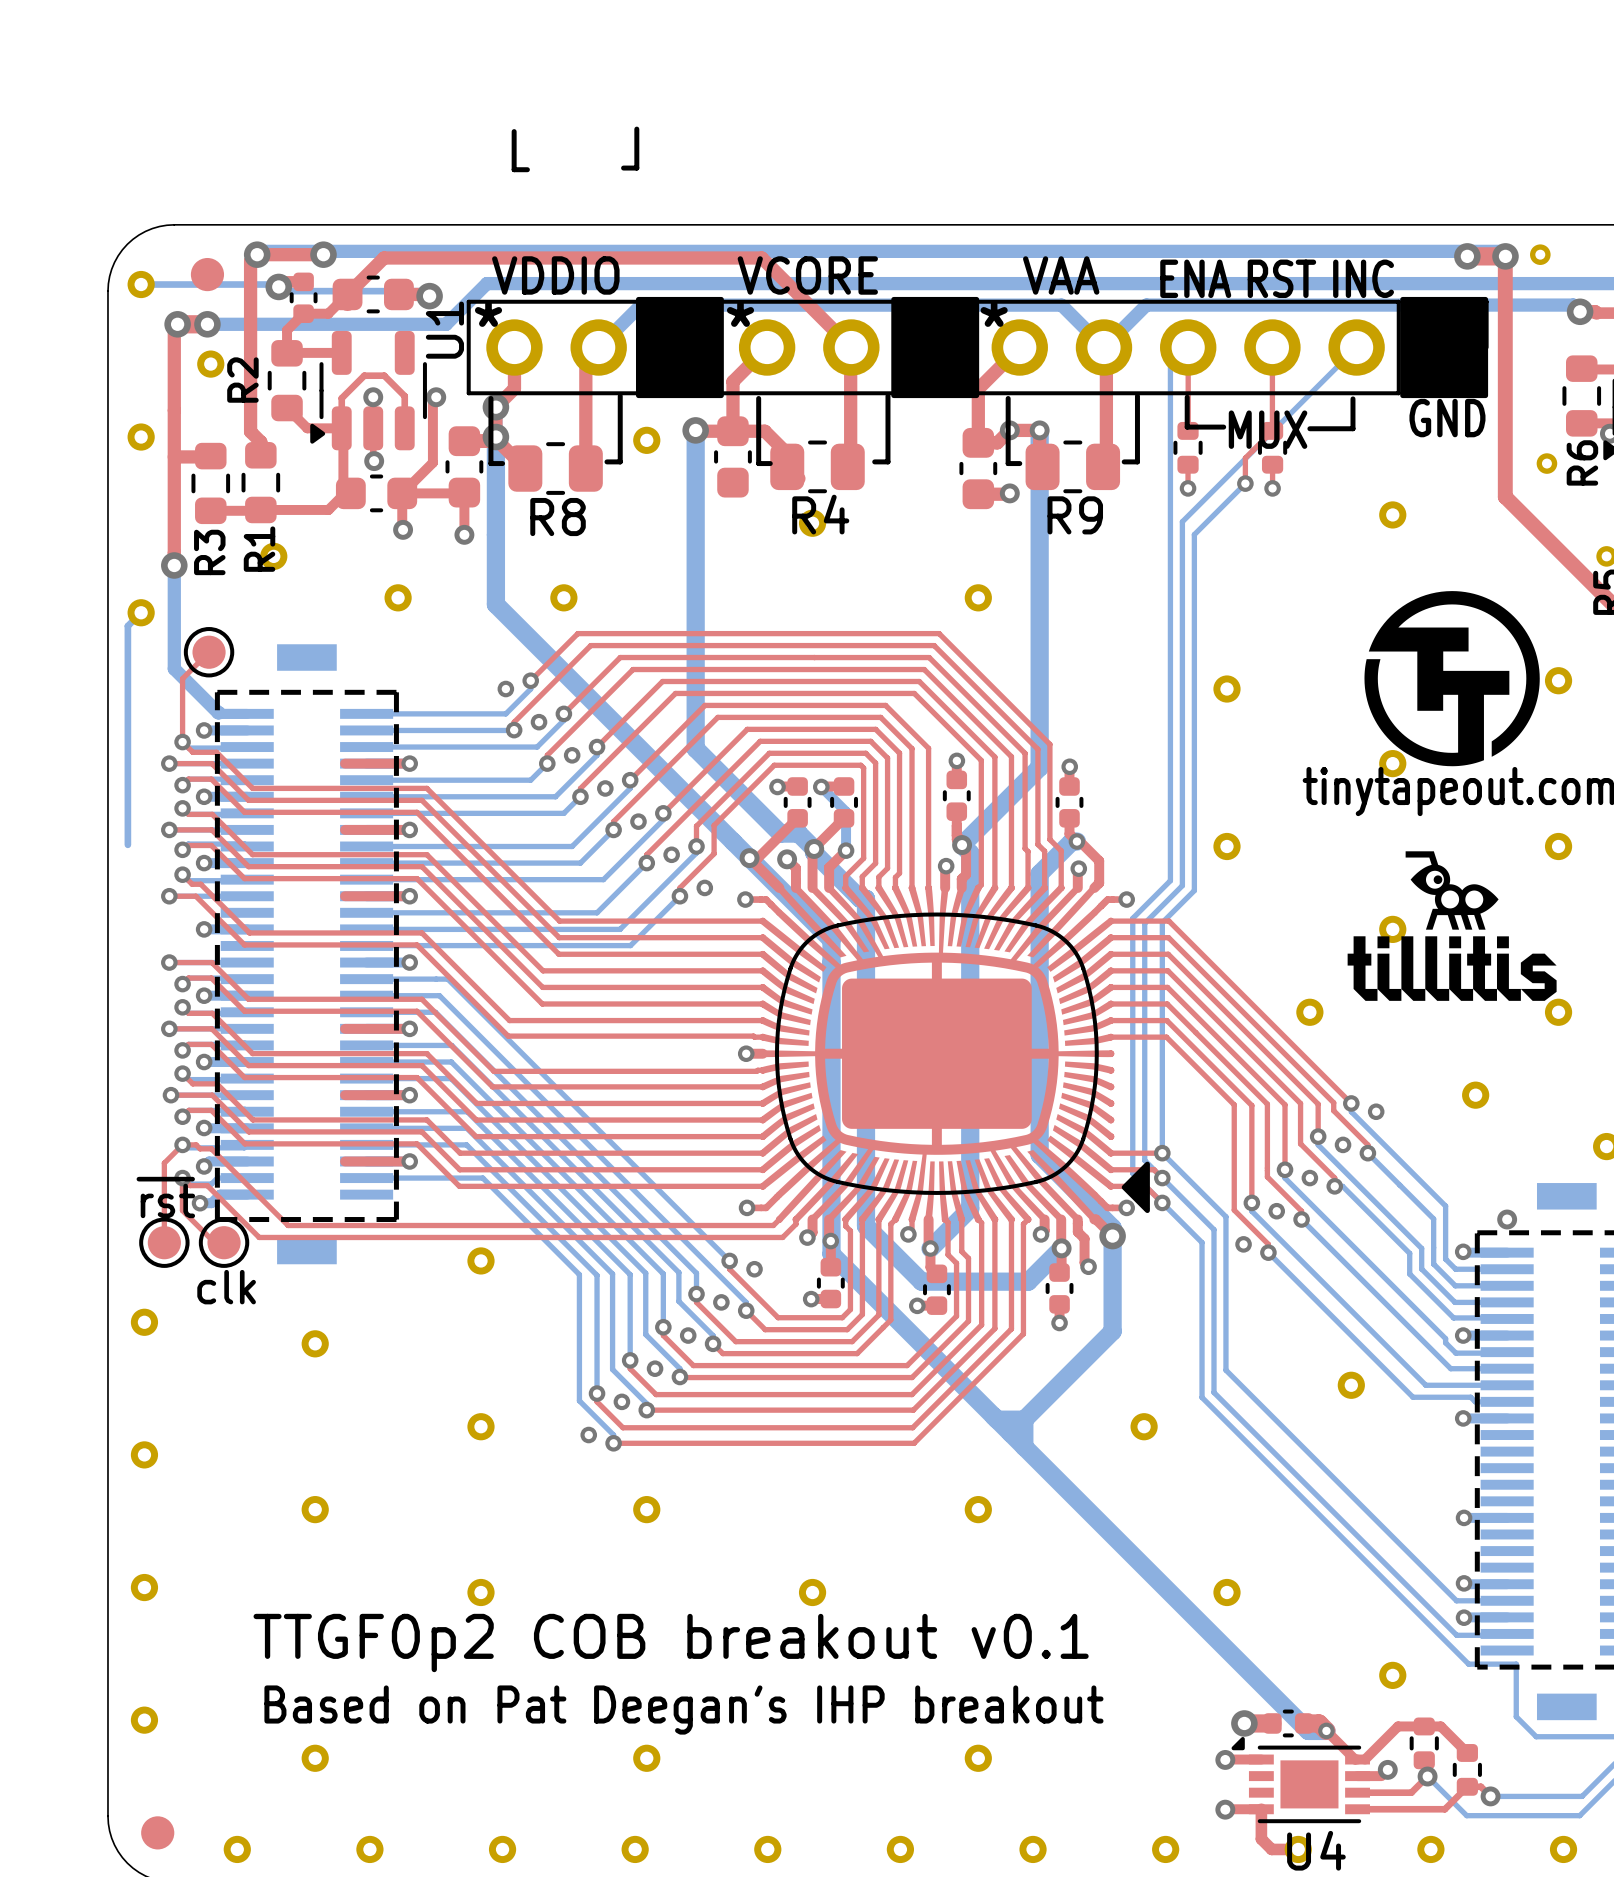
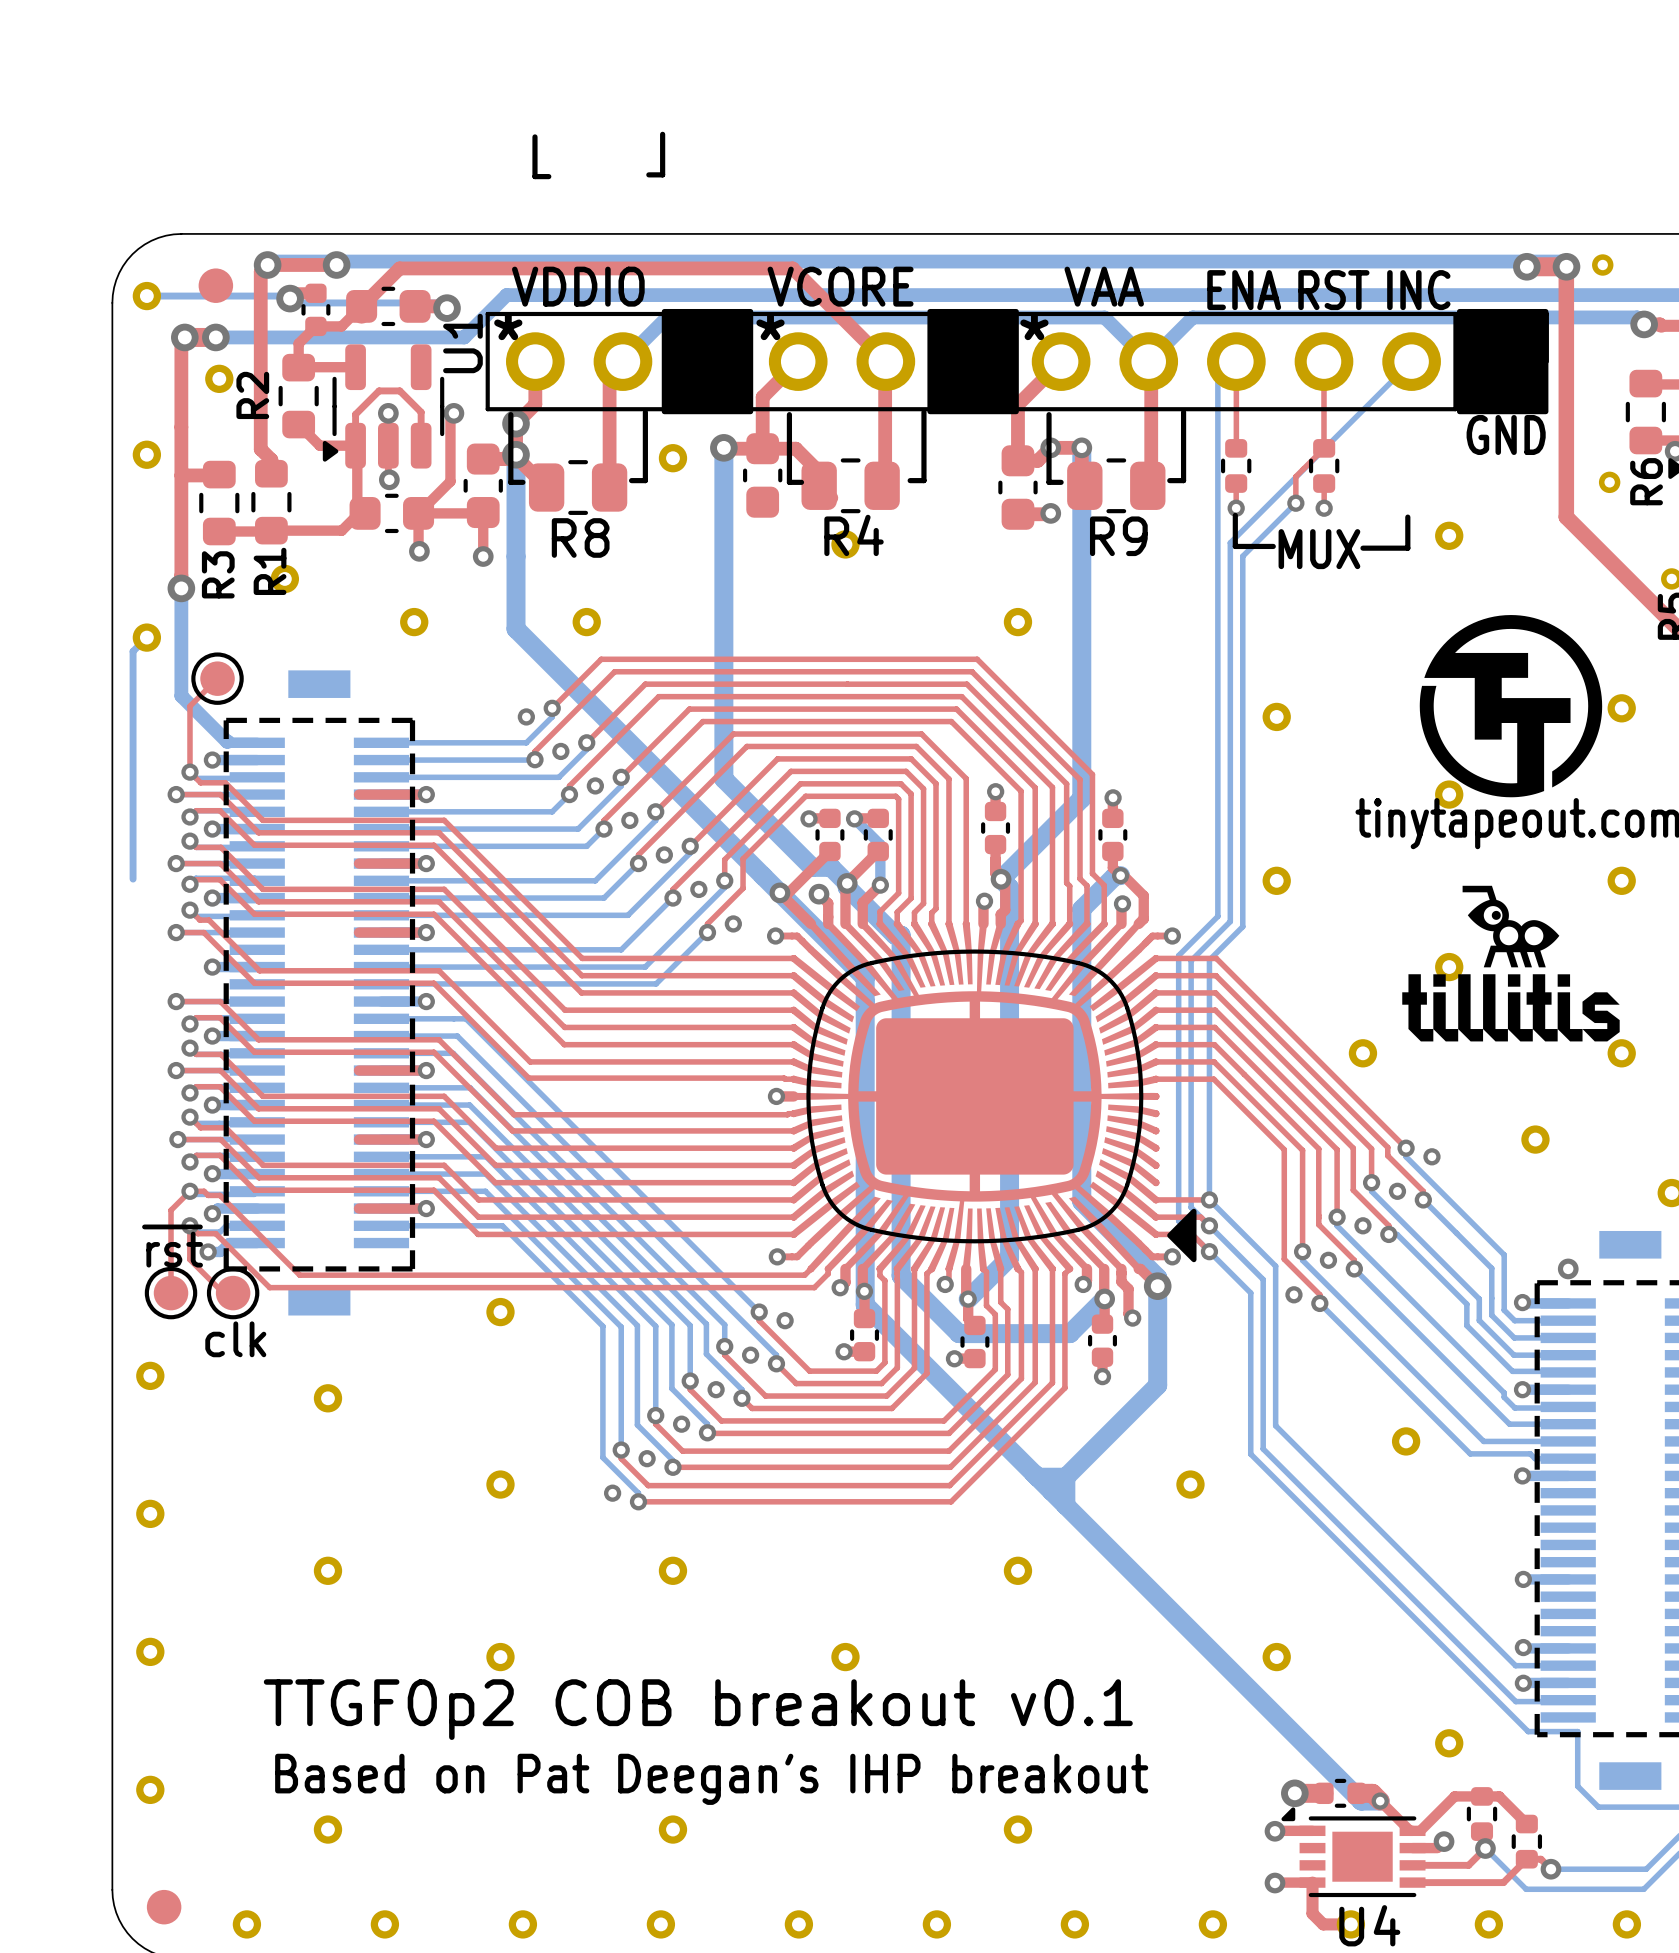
line: (1187, 397) (1187, 427) (1223, 427) -> (1235, 515) (1235, 546) (1273, 546)
line: (1352, 398) (1352, 428) (1309, 428) -> (1407, 517) (1407, 548) (1362, 548)
text position: MUX (1268, 429) -> MUX (1319, 549)

